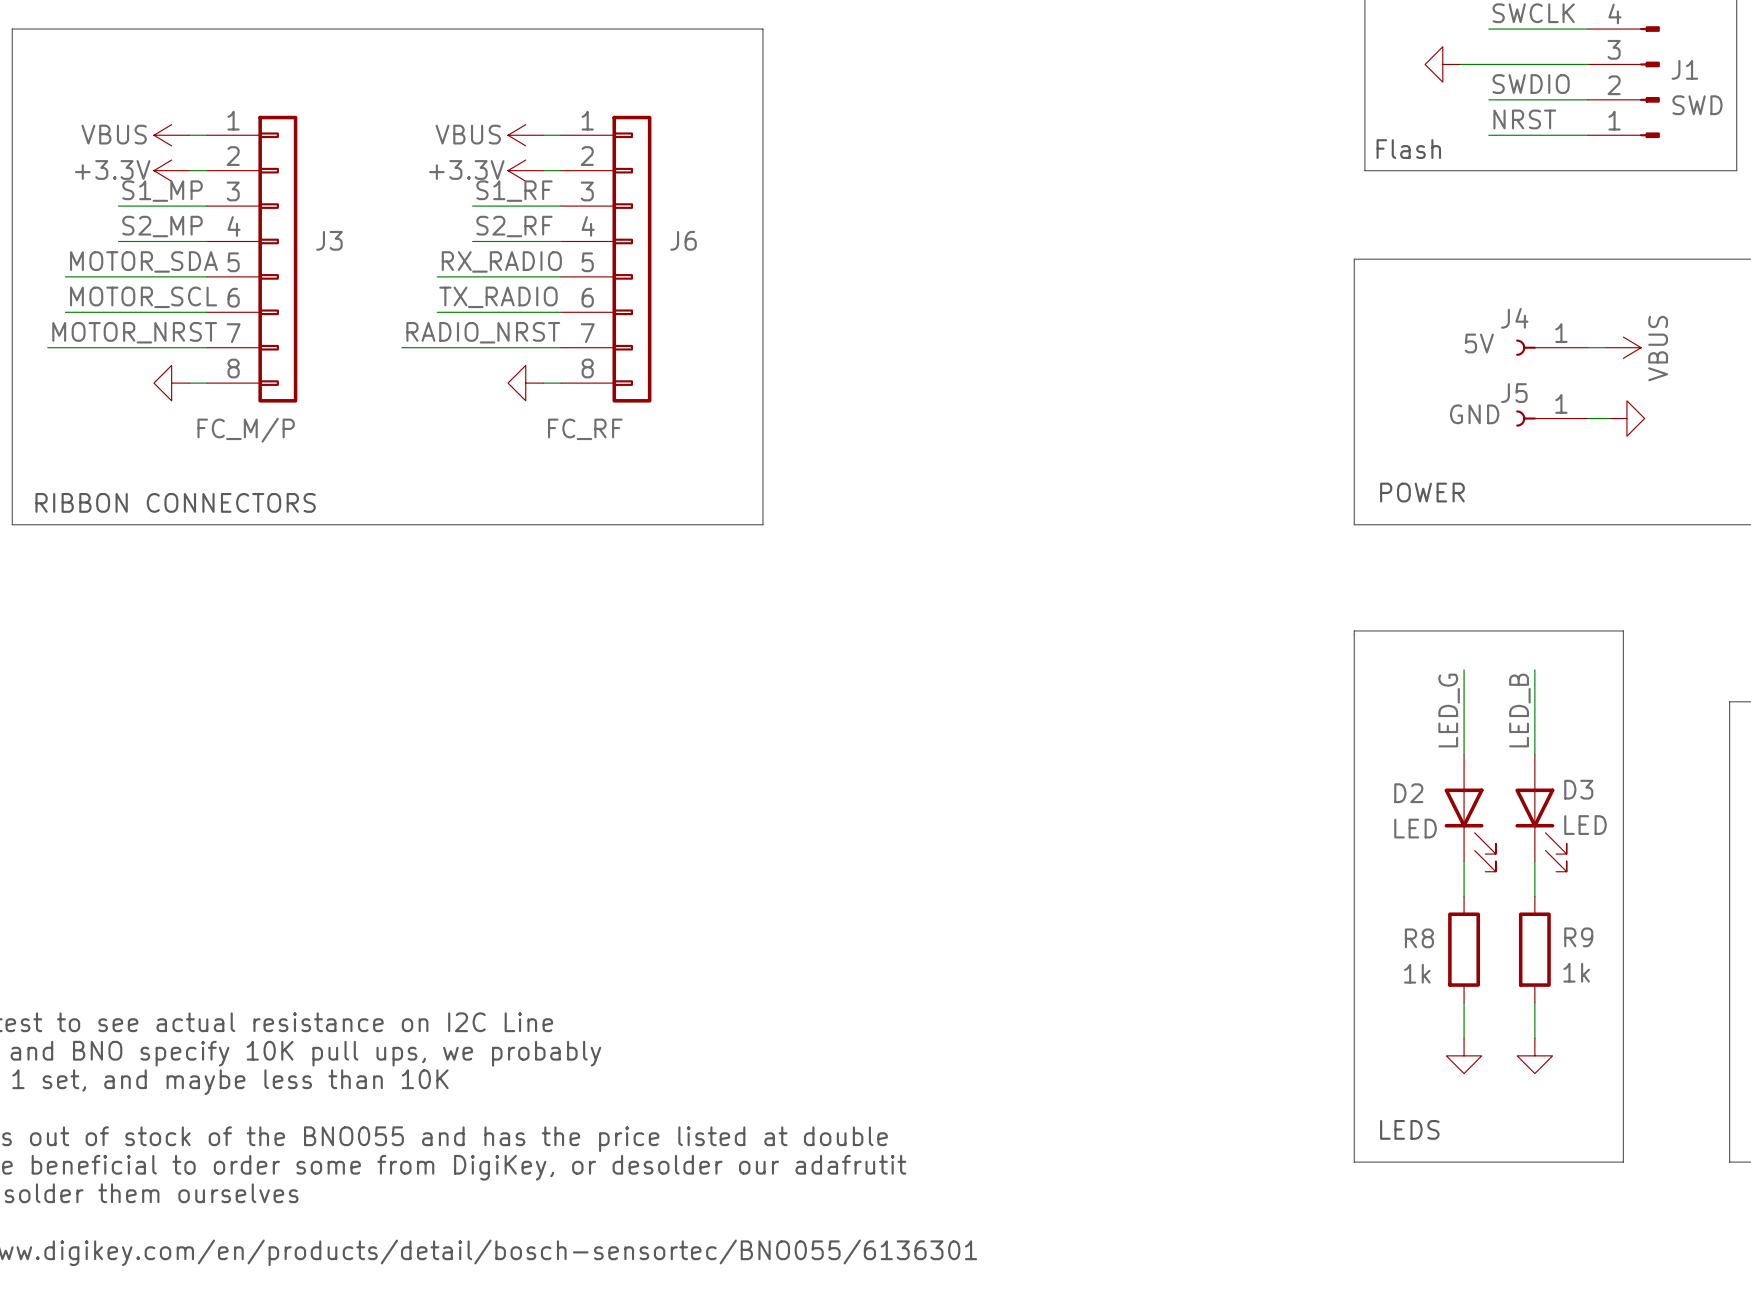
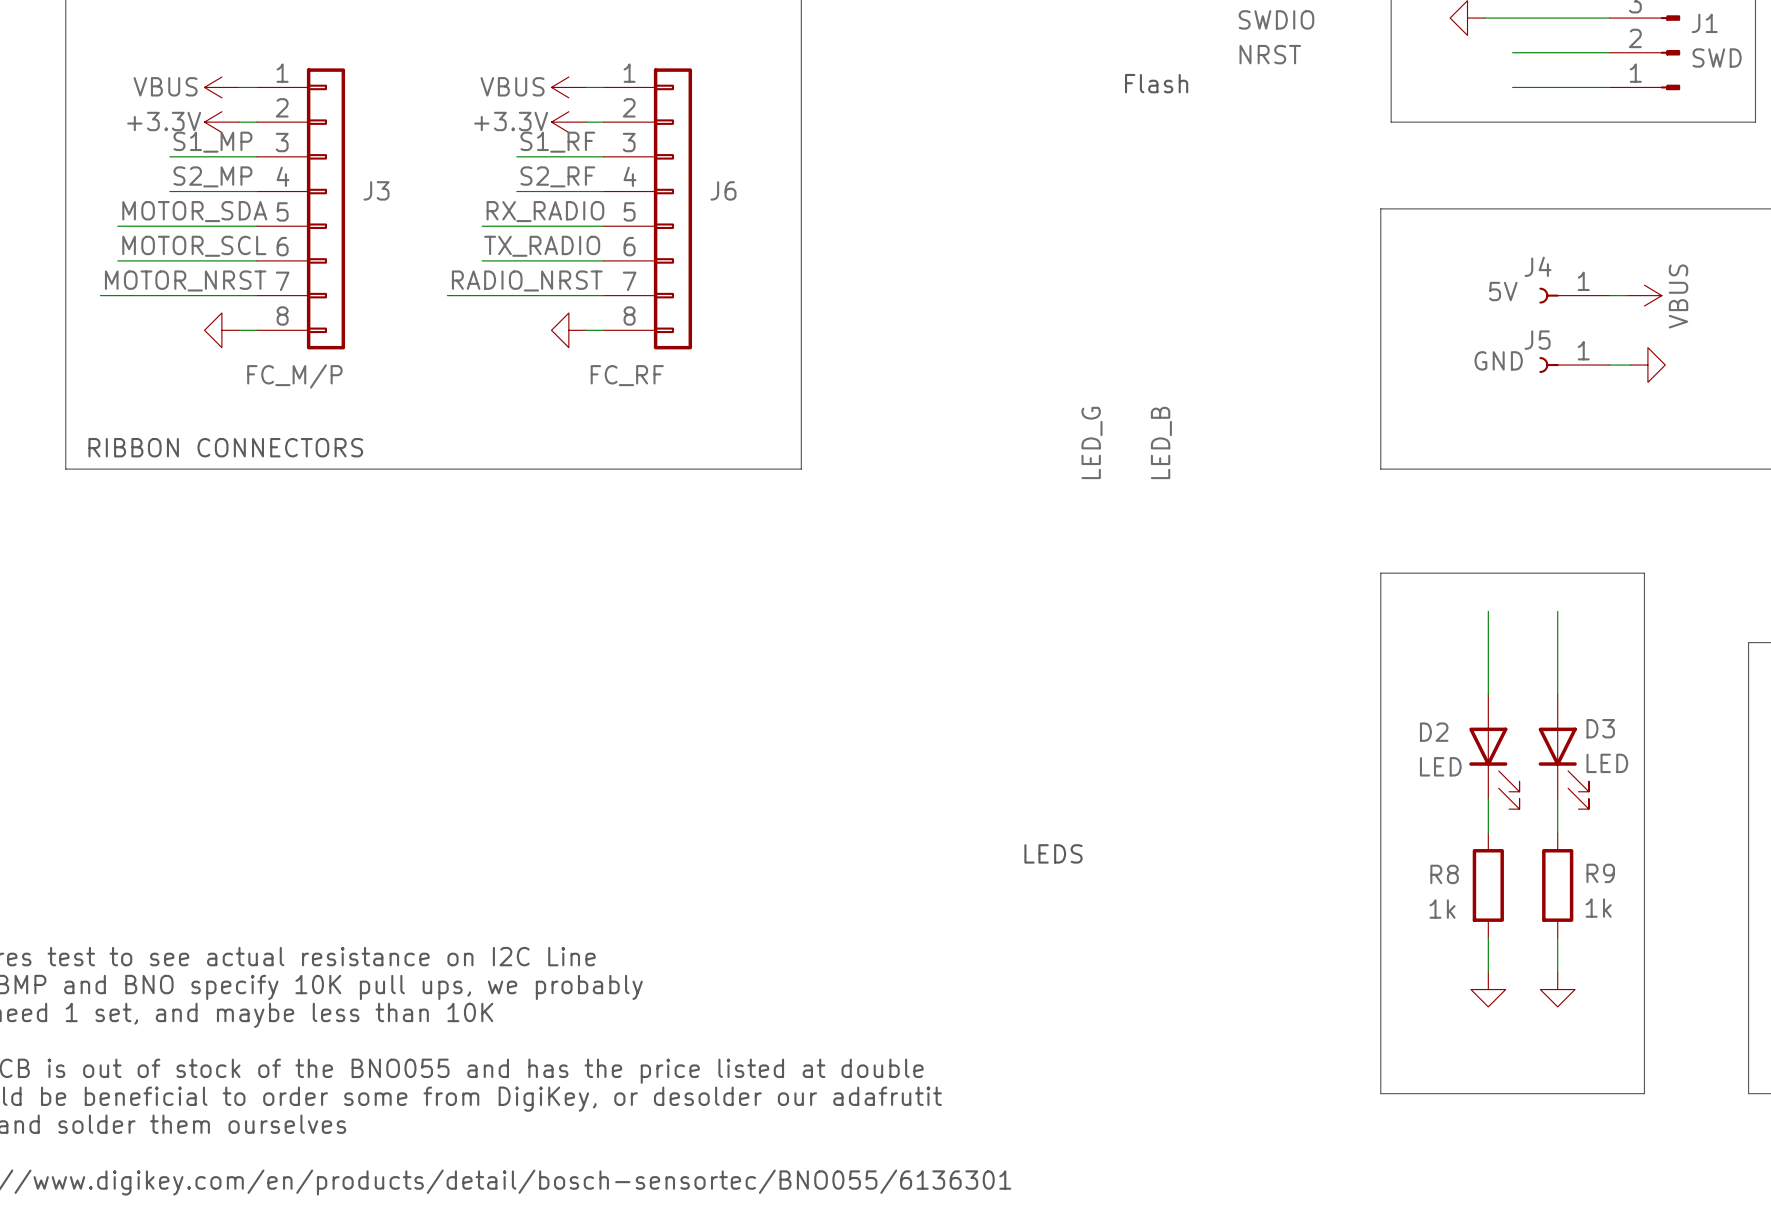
label position: SWDIO (1531, 84) -> SWDIO (1276, 19)
label position: NRST (1524, 119) -> NRST (1270, 54)
text position: Flash (1408, 149) -> Flash (1156, 83)
text: POWER (1422, 492) -> none
label: none -> LED_G (1092, 442)
label: none -> LED_B (1161, 442)
label: LED_G (1449, 710) -> none
label: LED_B (1519, 710) -> none
text: none -> LEDS (1053, 853)
text: LEDS (1409, 1129) -> none

